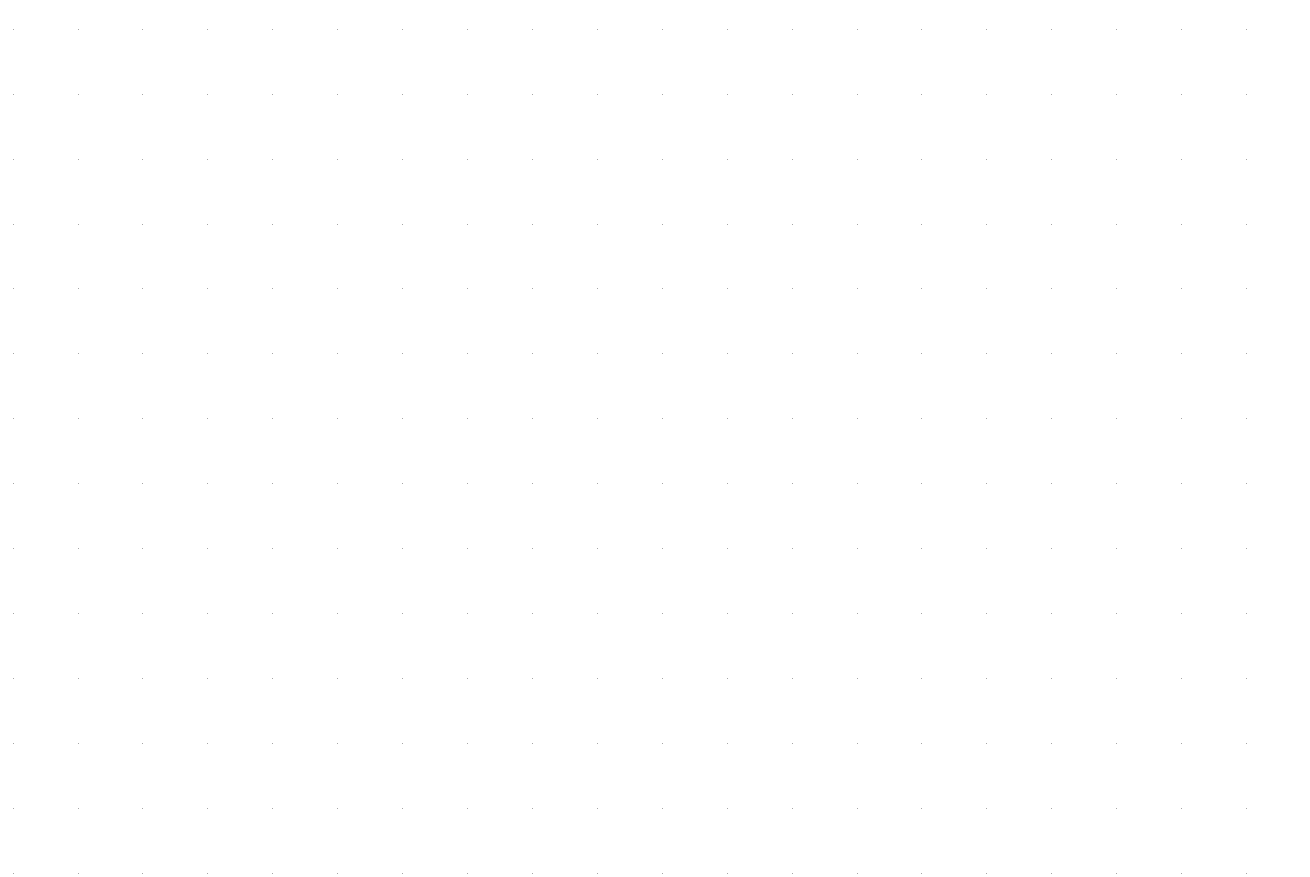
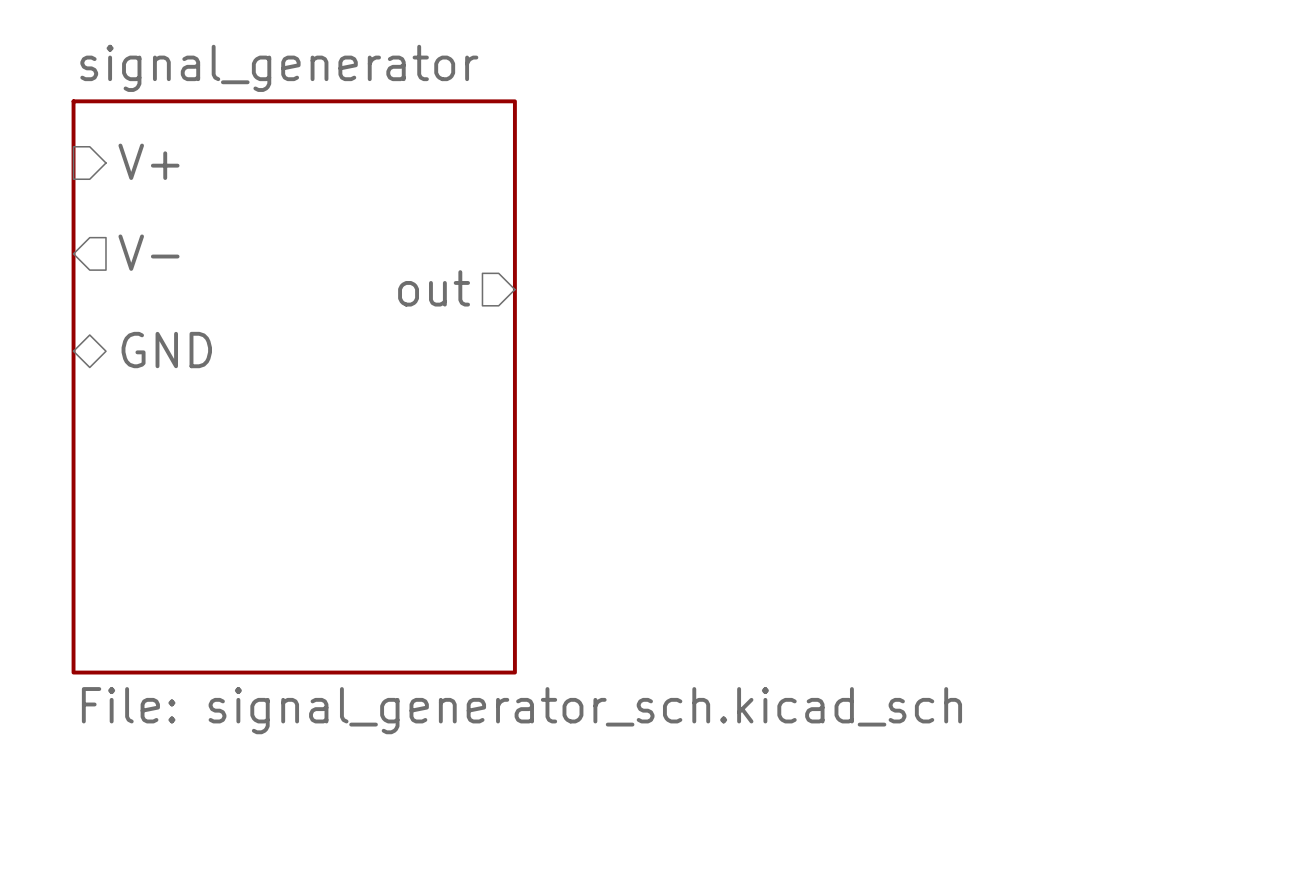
sheet pin: none -> V+ (149, 161)
sheet pin: none -> V- (149, 252)
sheet pin: none -> out (434, 288)
sheet pin: none -> GND (166, 350)
sheet signal_generator: none -> File: signal_generator_sch.kicad_sch (294, 386)

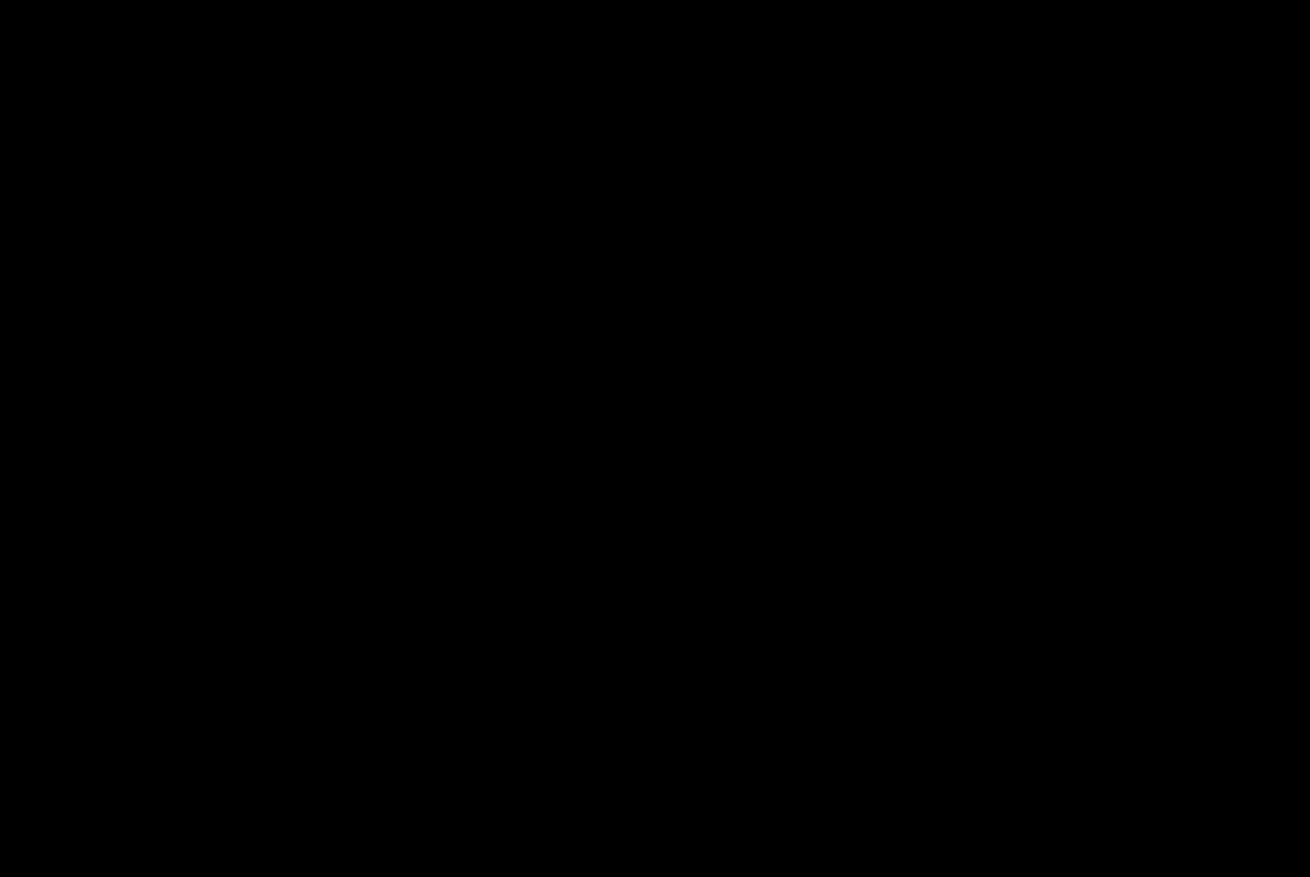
sheet pin: V+ (149, 161) -> none
sheet pin: V- (149, 252) -> none
sheet pin: out (434, 288) -> none
sheet pin: GND (166, 350) -> none
sheet signal_generator: File: signal_generator_sch.kicad_sch (294, 386) -> none

